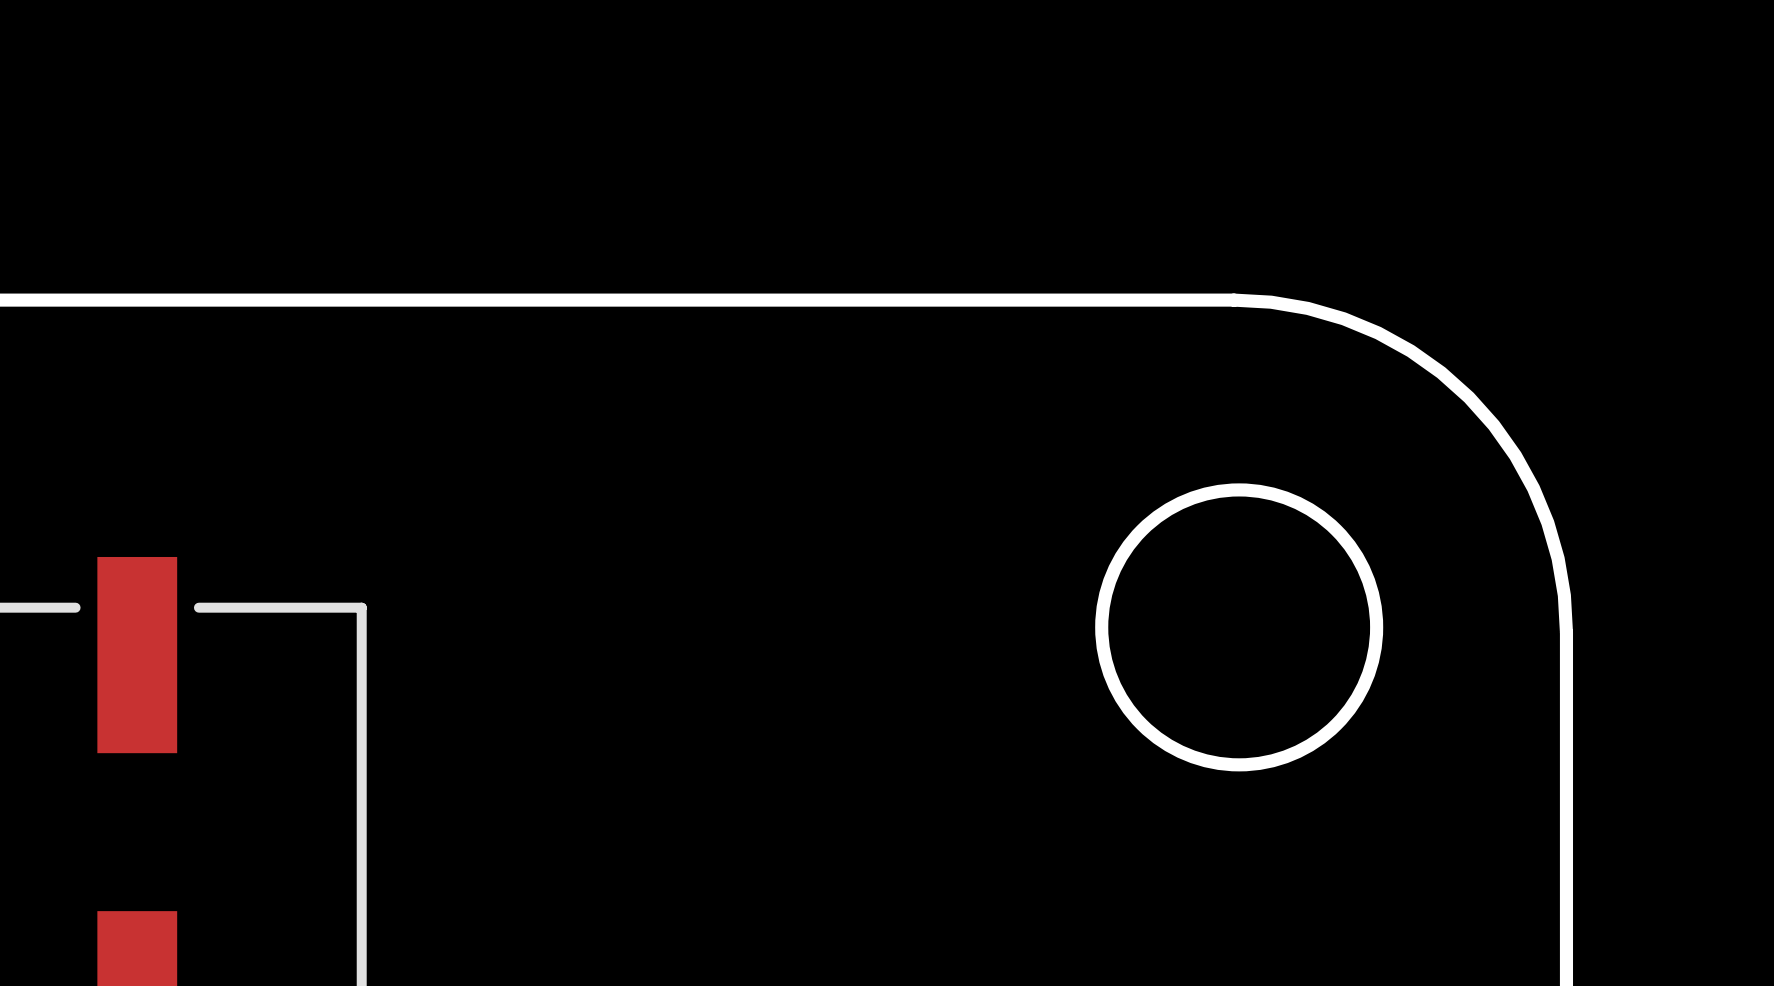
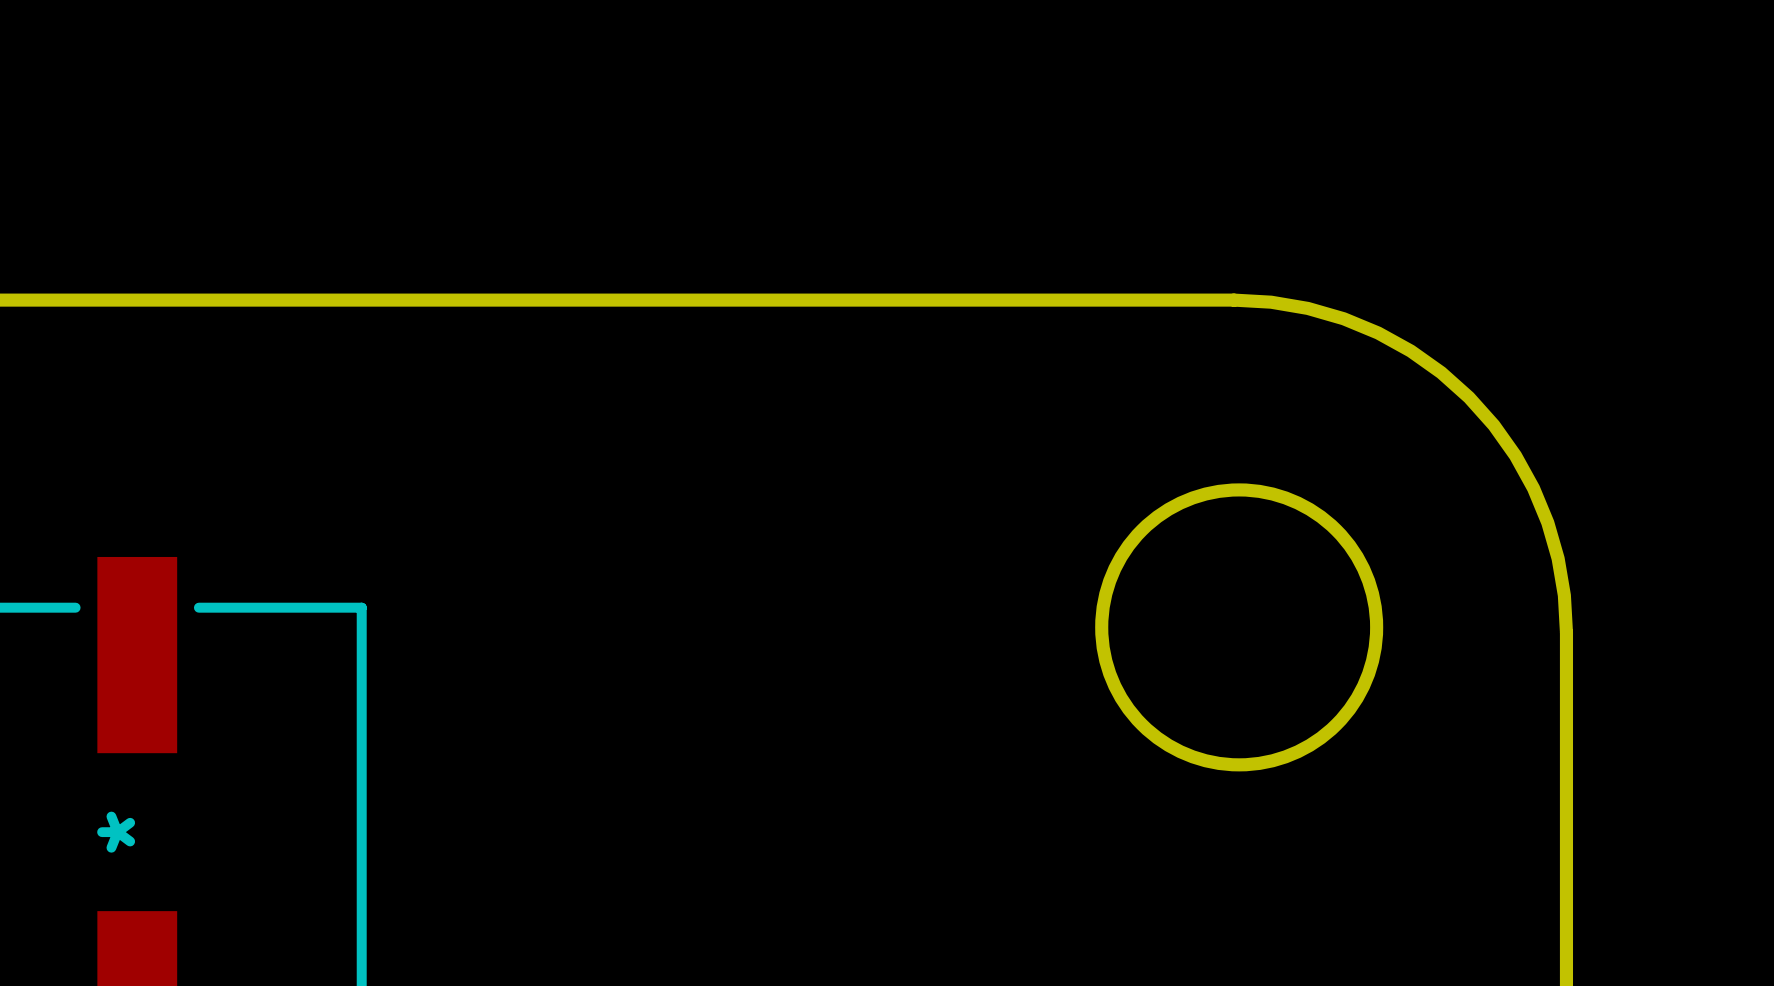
part text: none -> * (116, 832)

